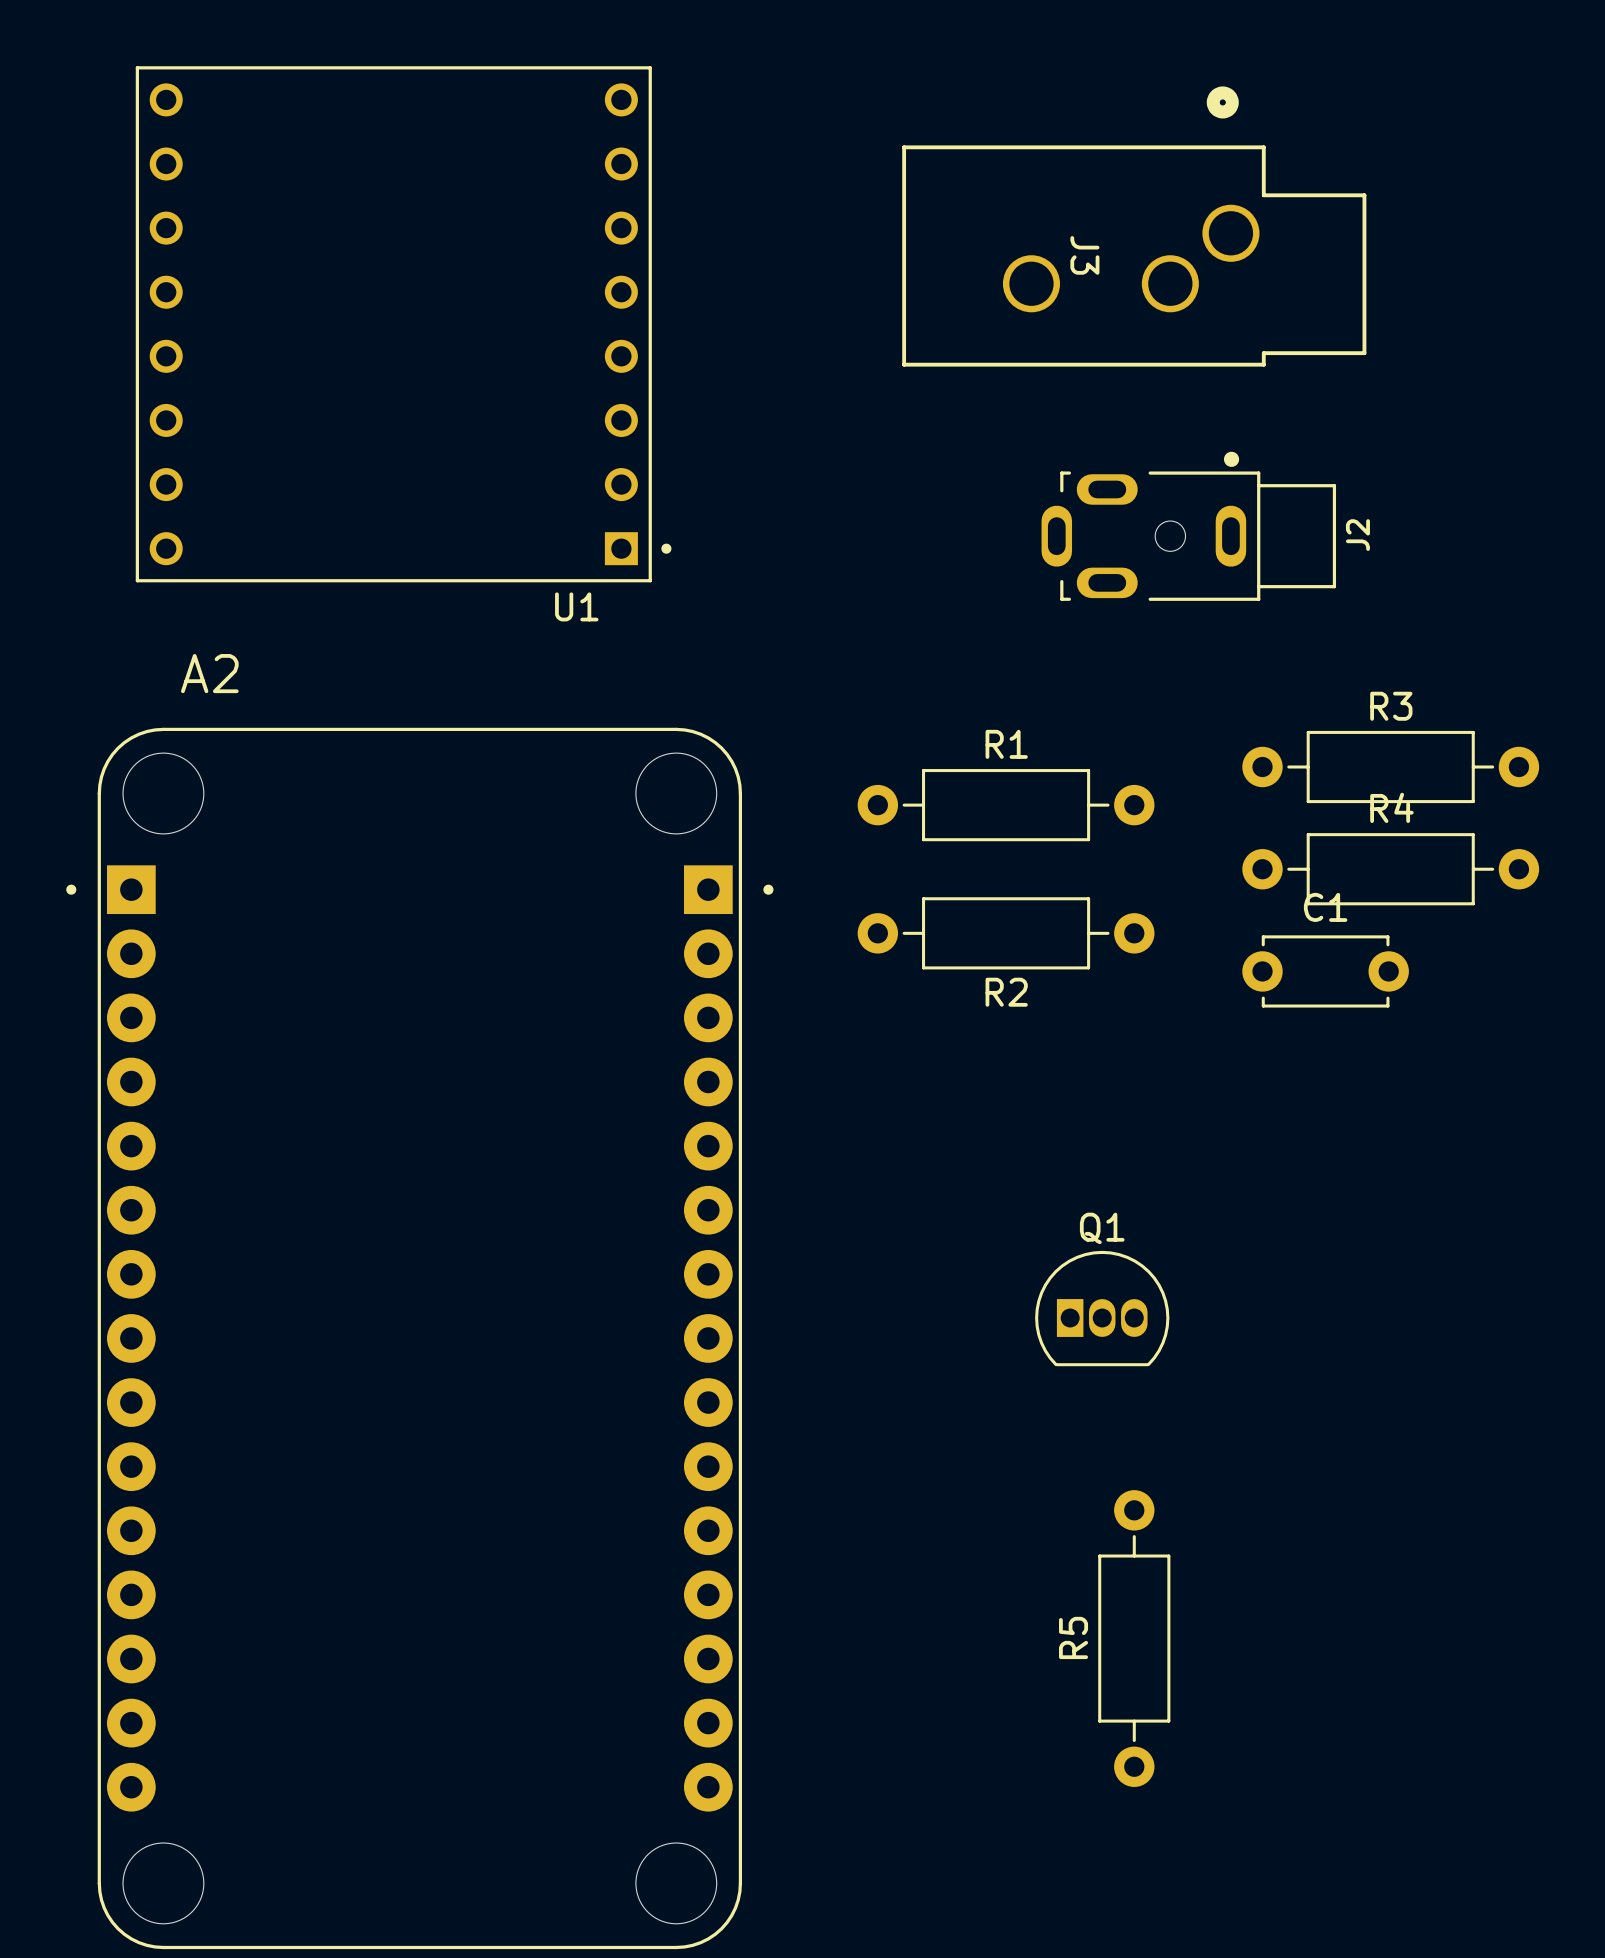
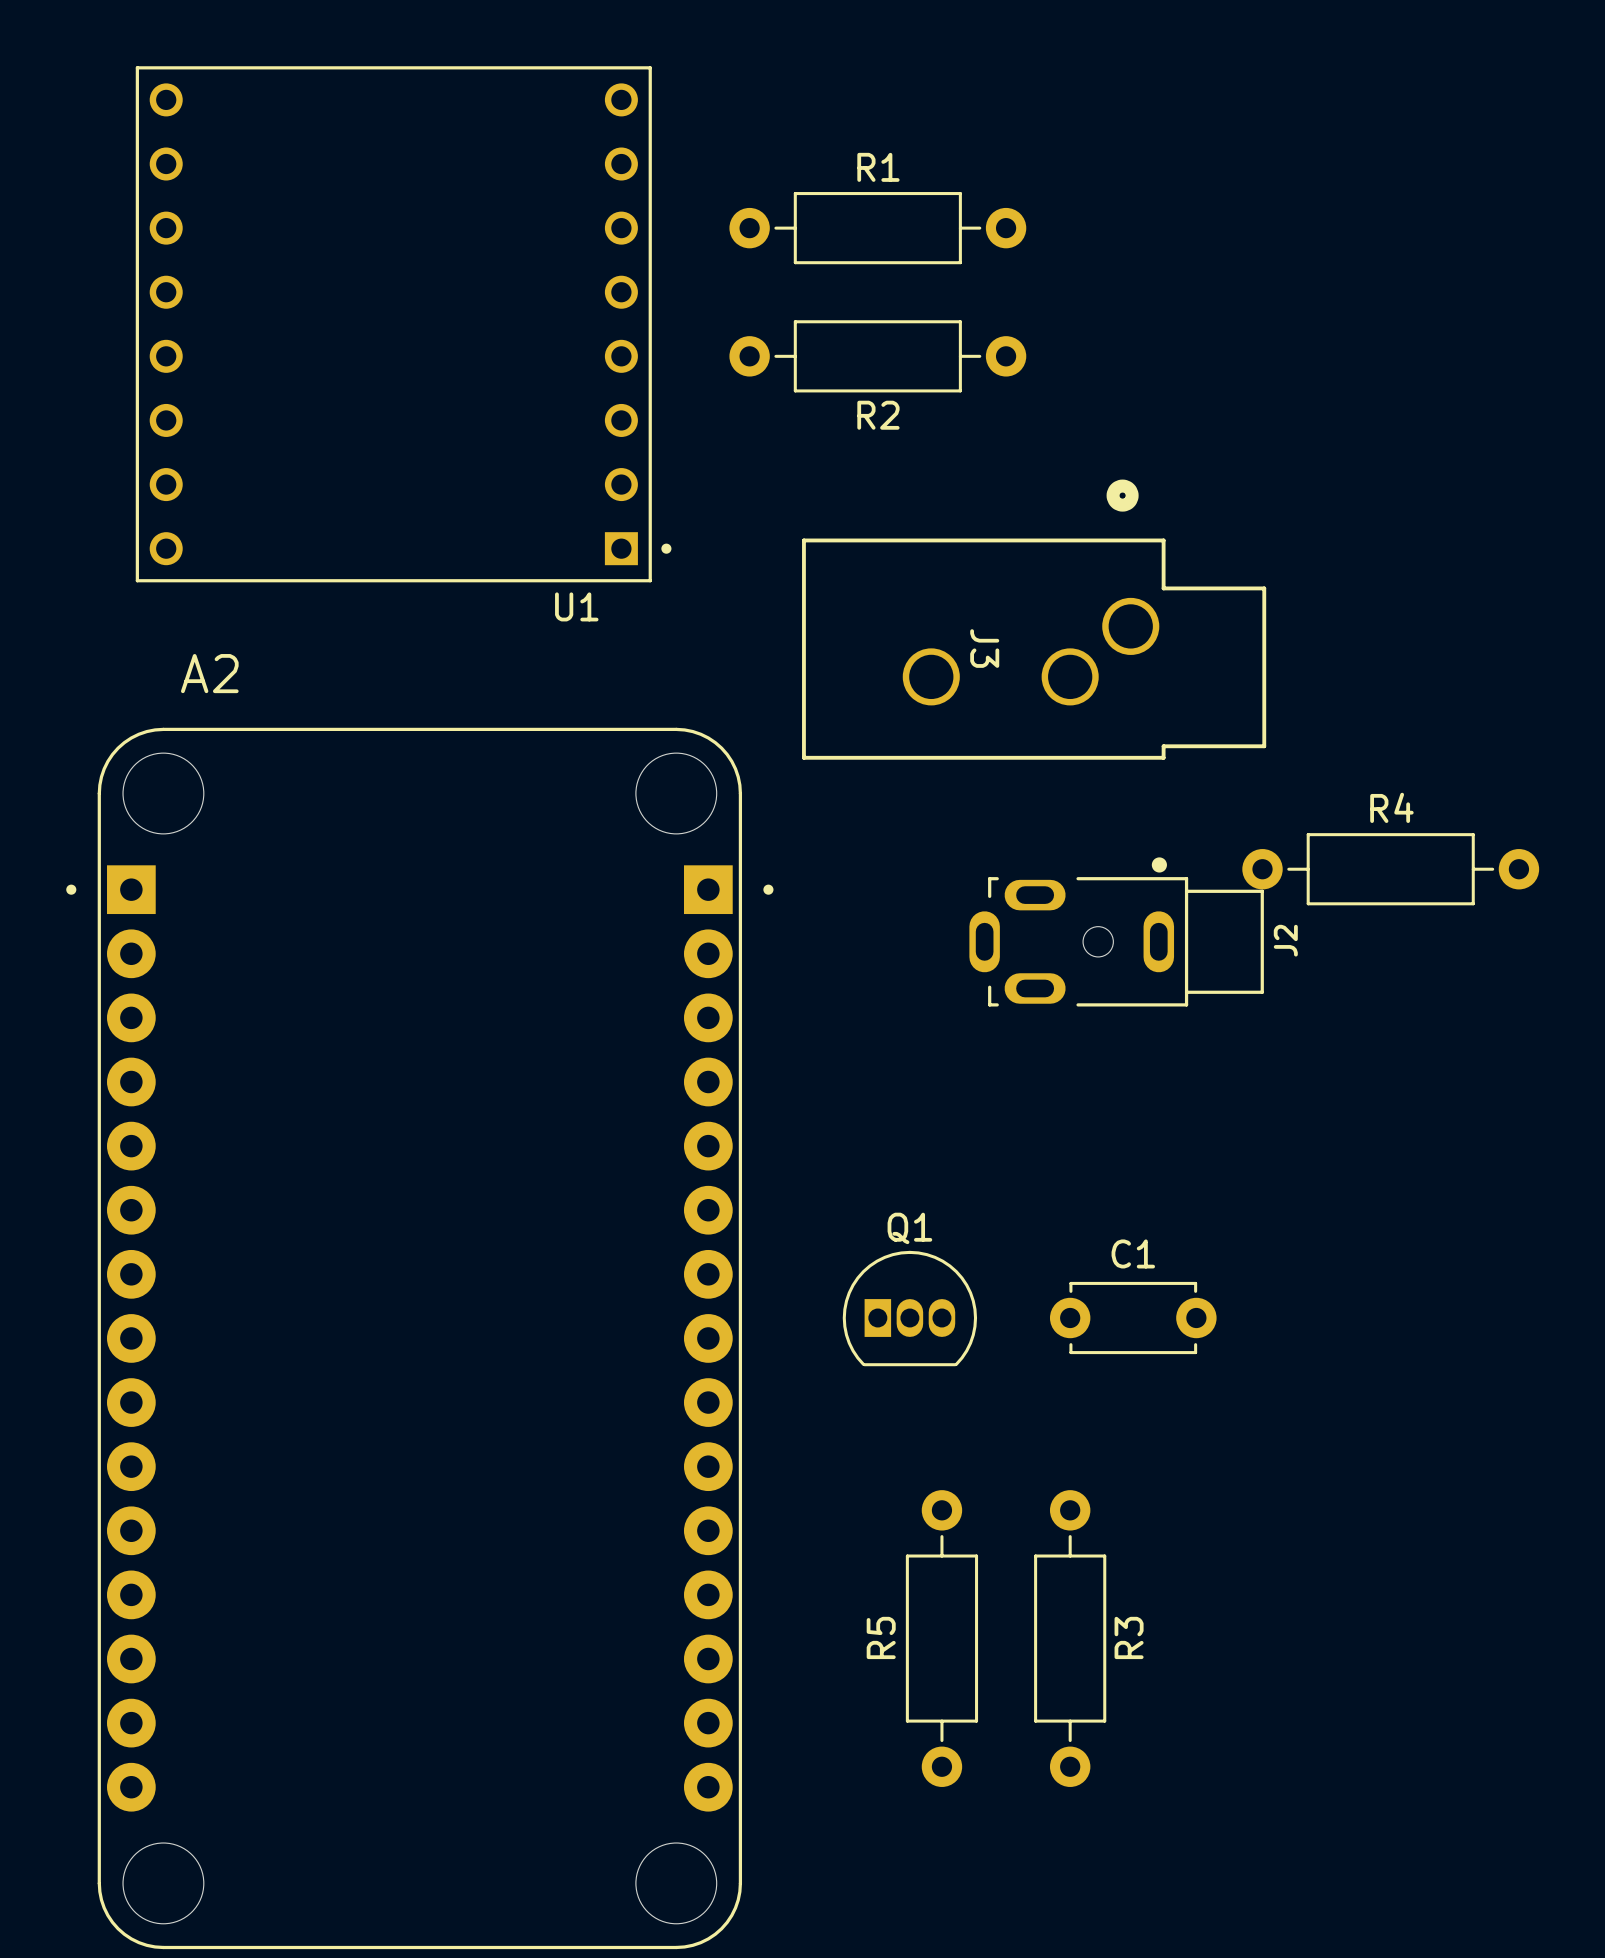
J3 position: (1134, 226) -> (1034, 619)
J2 position: (1188, 526) -> (1116, 931)
R3 rotation: 0° (1390, 767) -> 90° clockwise (1070, 1638)
R3 position: (1390, 767) -> (1070, 1638)
R1 position: (1006, 805) -> (877, 228)
R2 position: (1006, 933) -> (877, 356)
C1 position: (1325, 971) -> (1133, 1318)
Q1 position: (1102, 1308) -> (909, 1308)
R5 position: (1134, 1638) -> (941, 1638)

